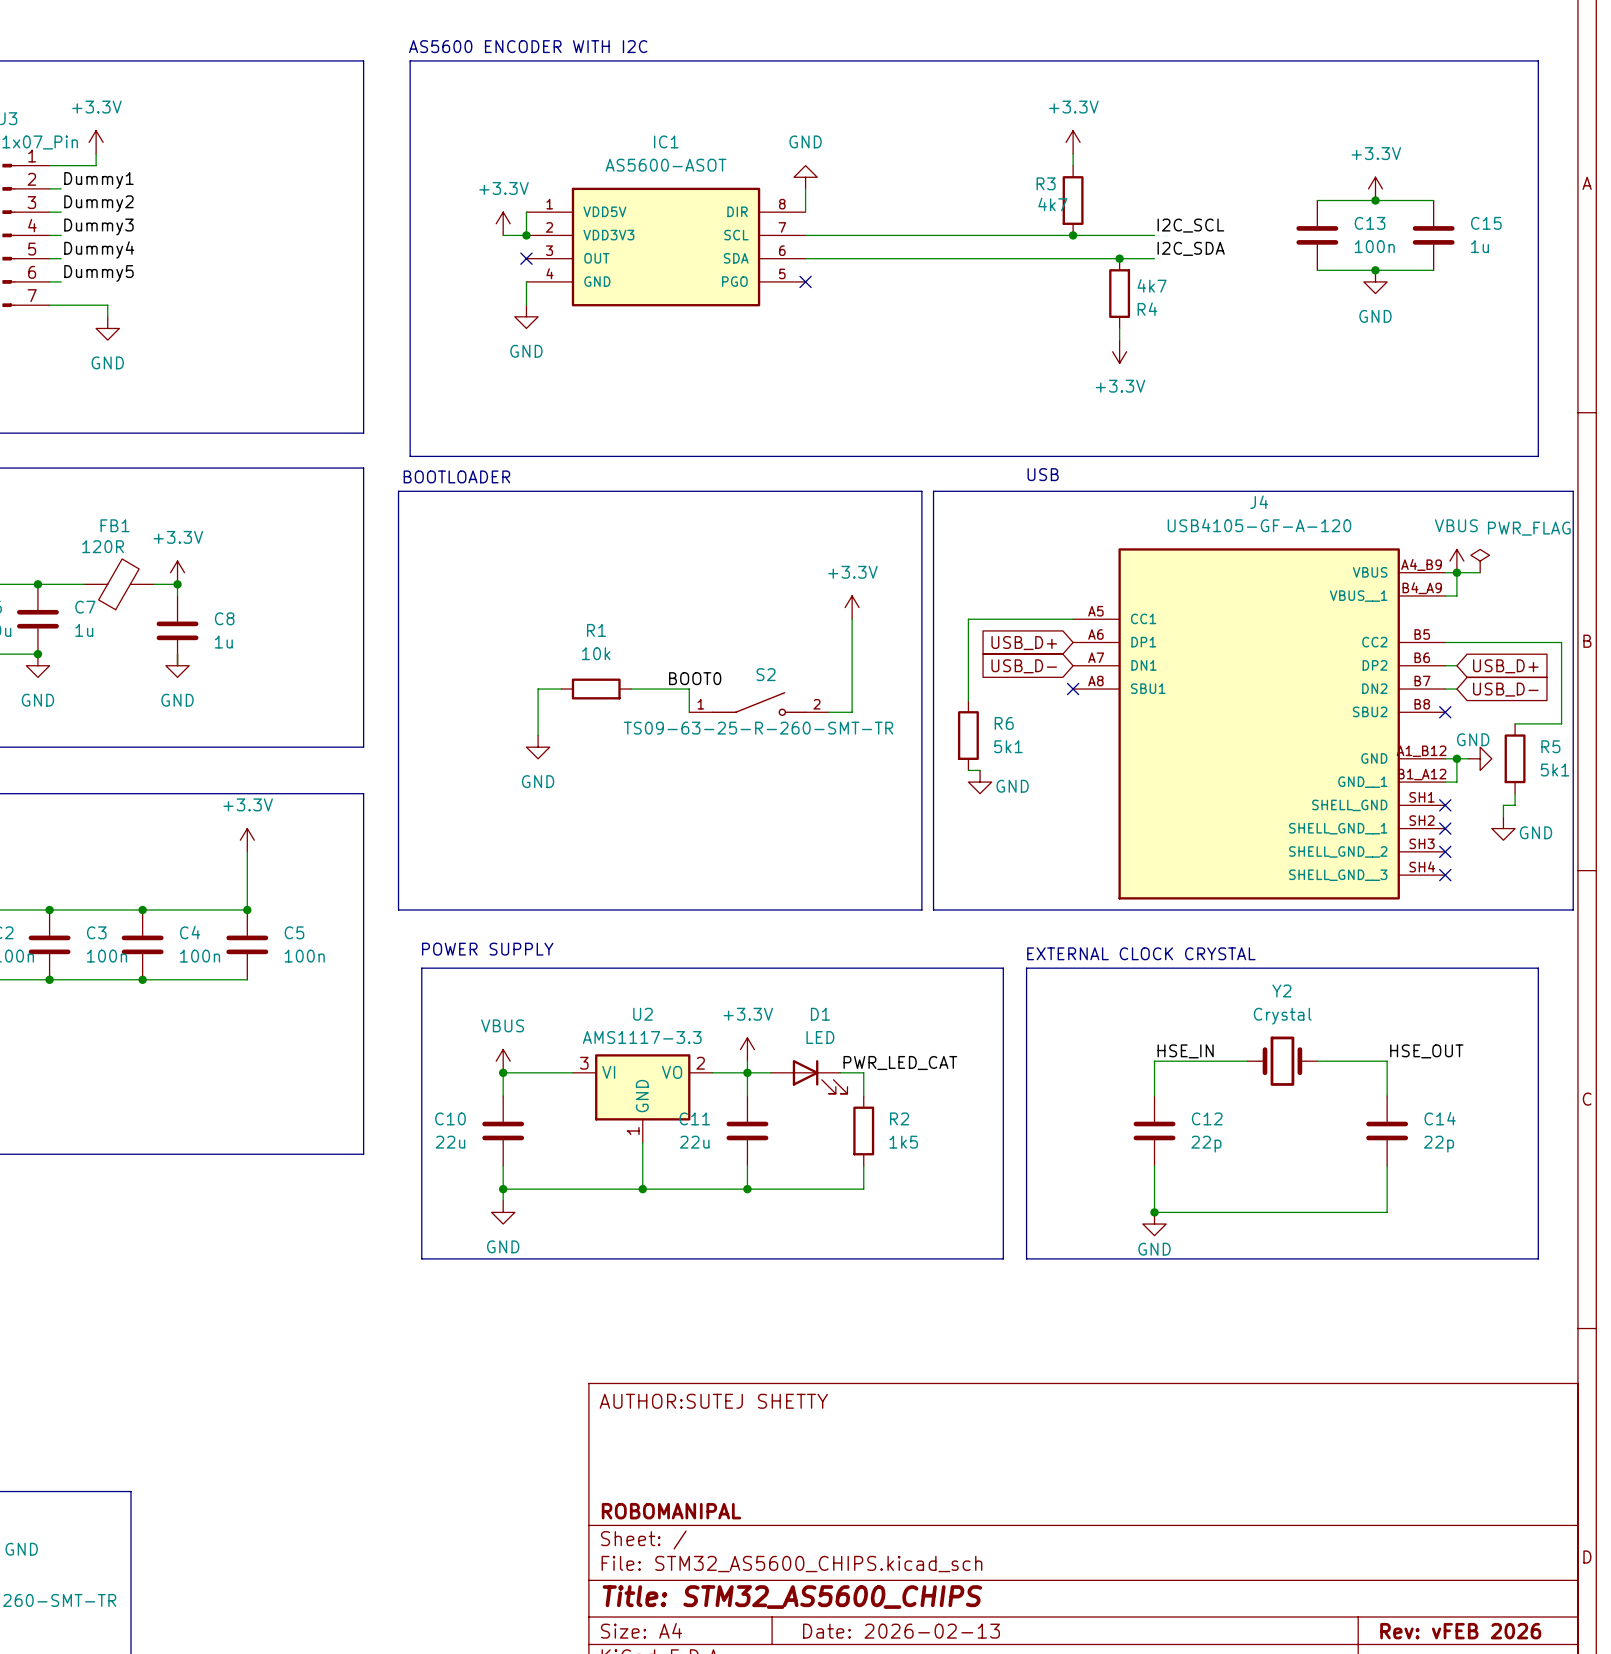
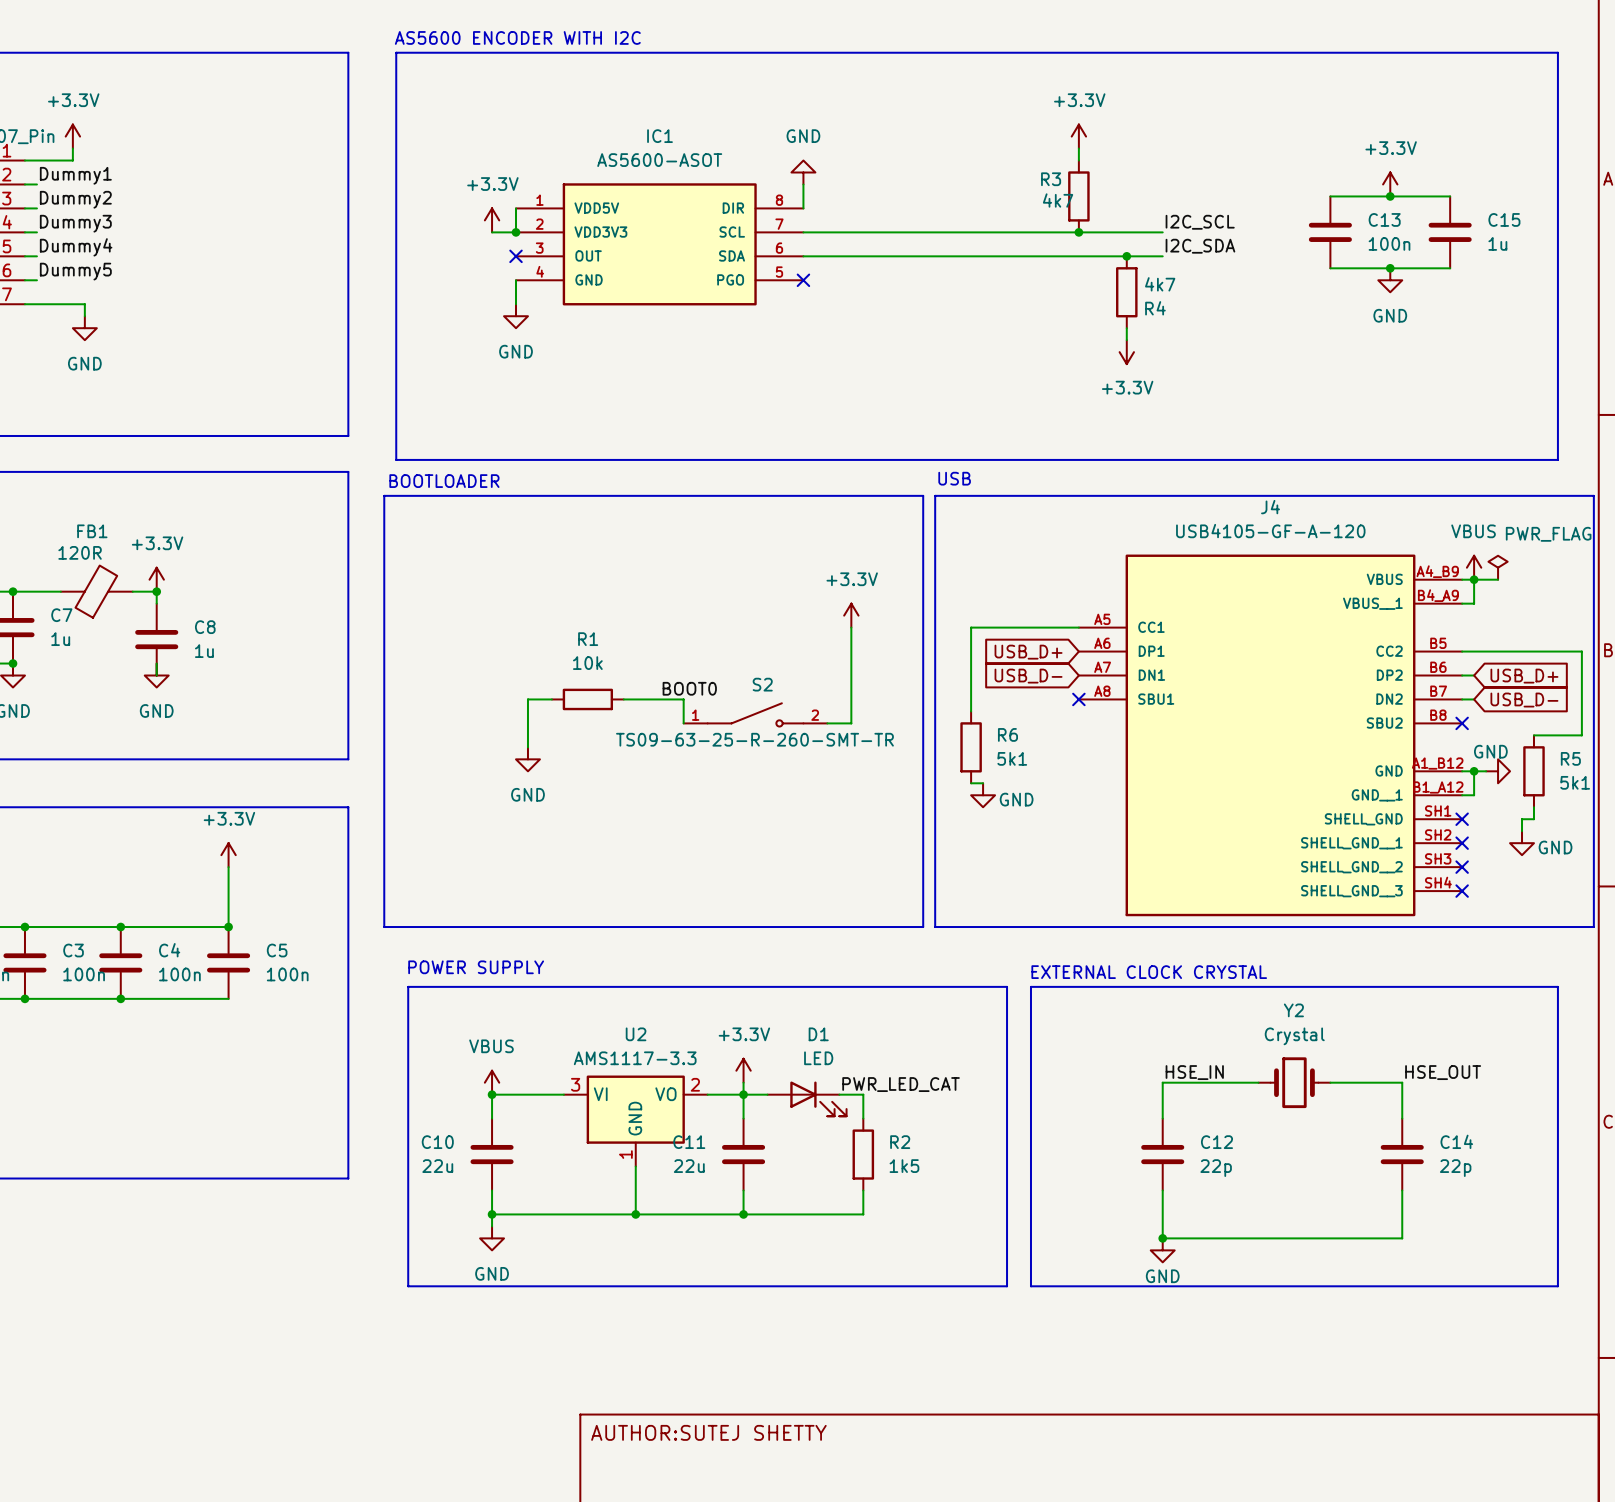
text position: USB (1043, 474) -> USB (954, 478)

